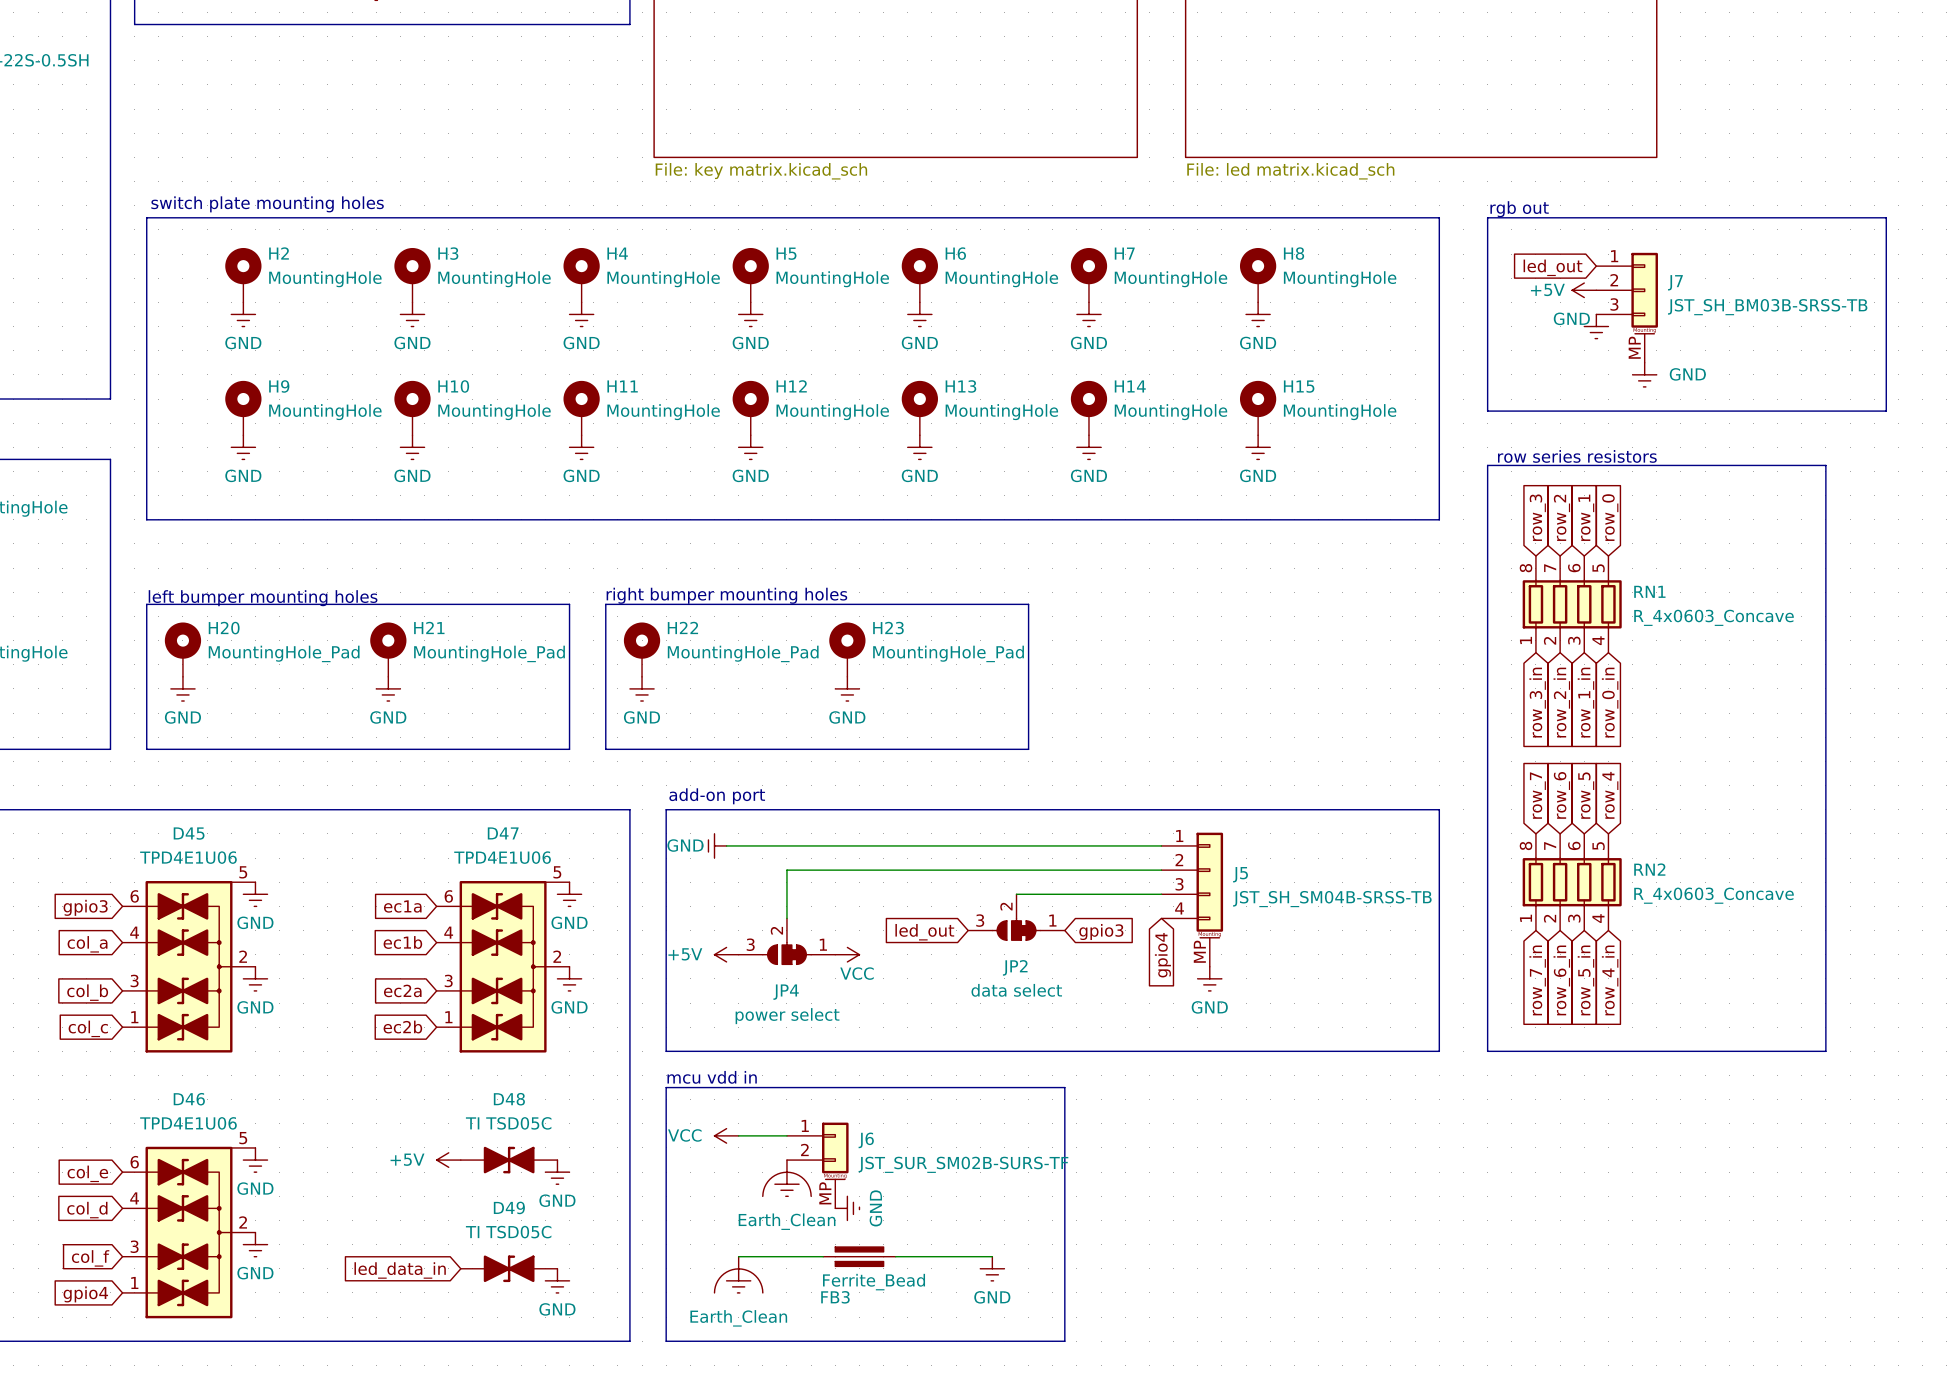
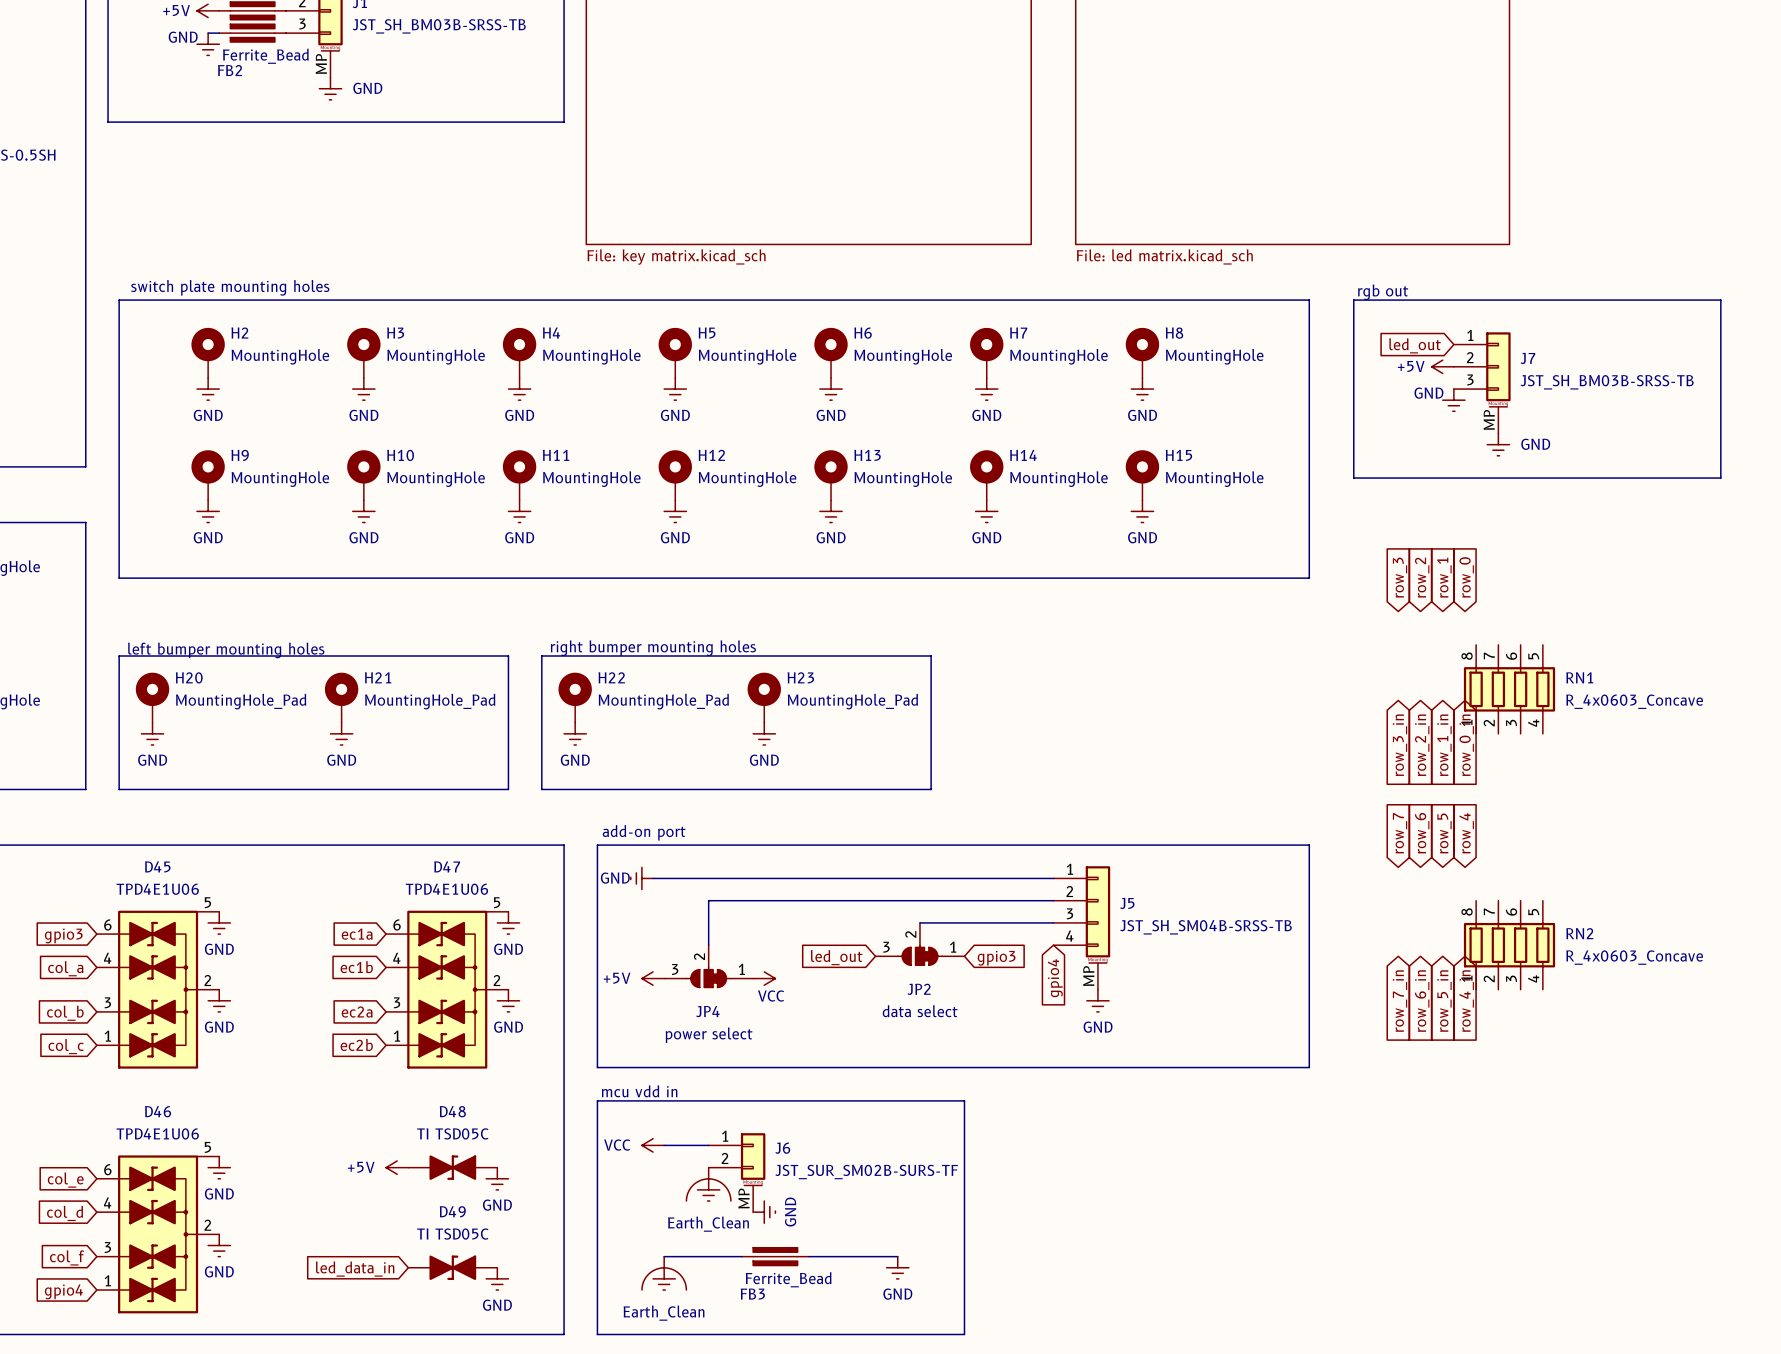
text: row series resistors (1577, 456) -> none
line: (1487, 465) (1825, 465) (1825, 1051) (1487, 1051) (1487, 465) -> none
RN1 position: (1572, 604) -> (1509, 689)
RN2 position: (1572, 882) -> (1509, 945)

